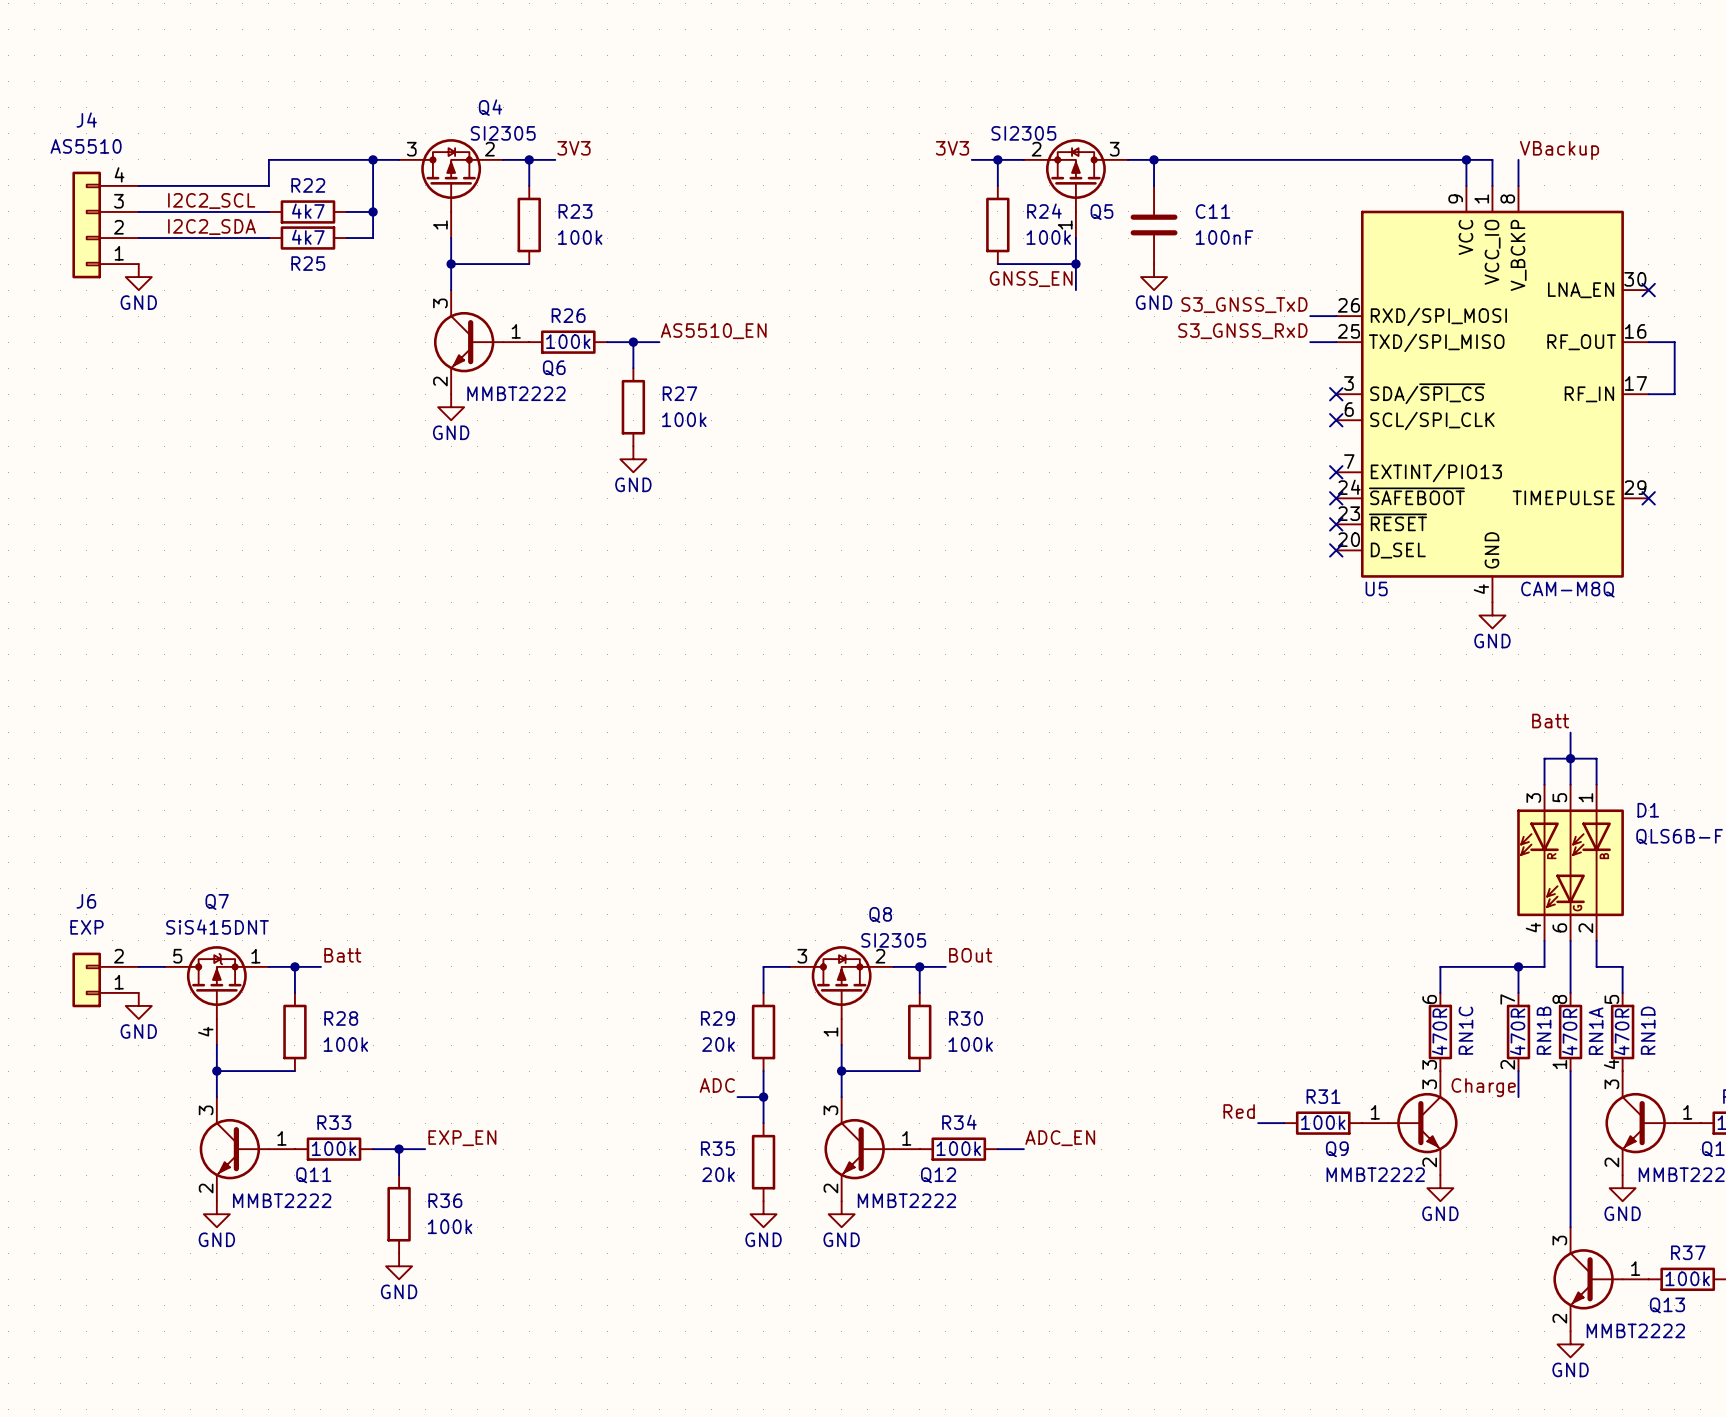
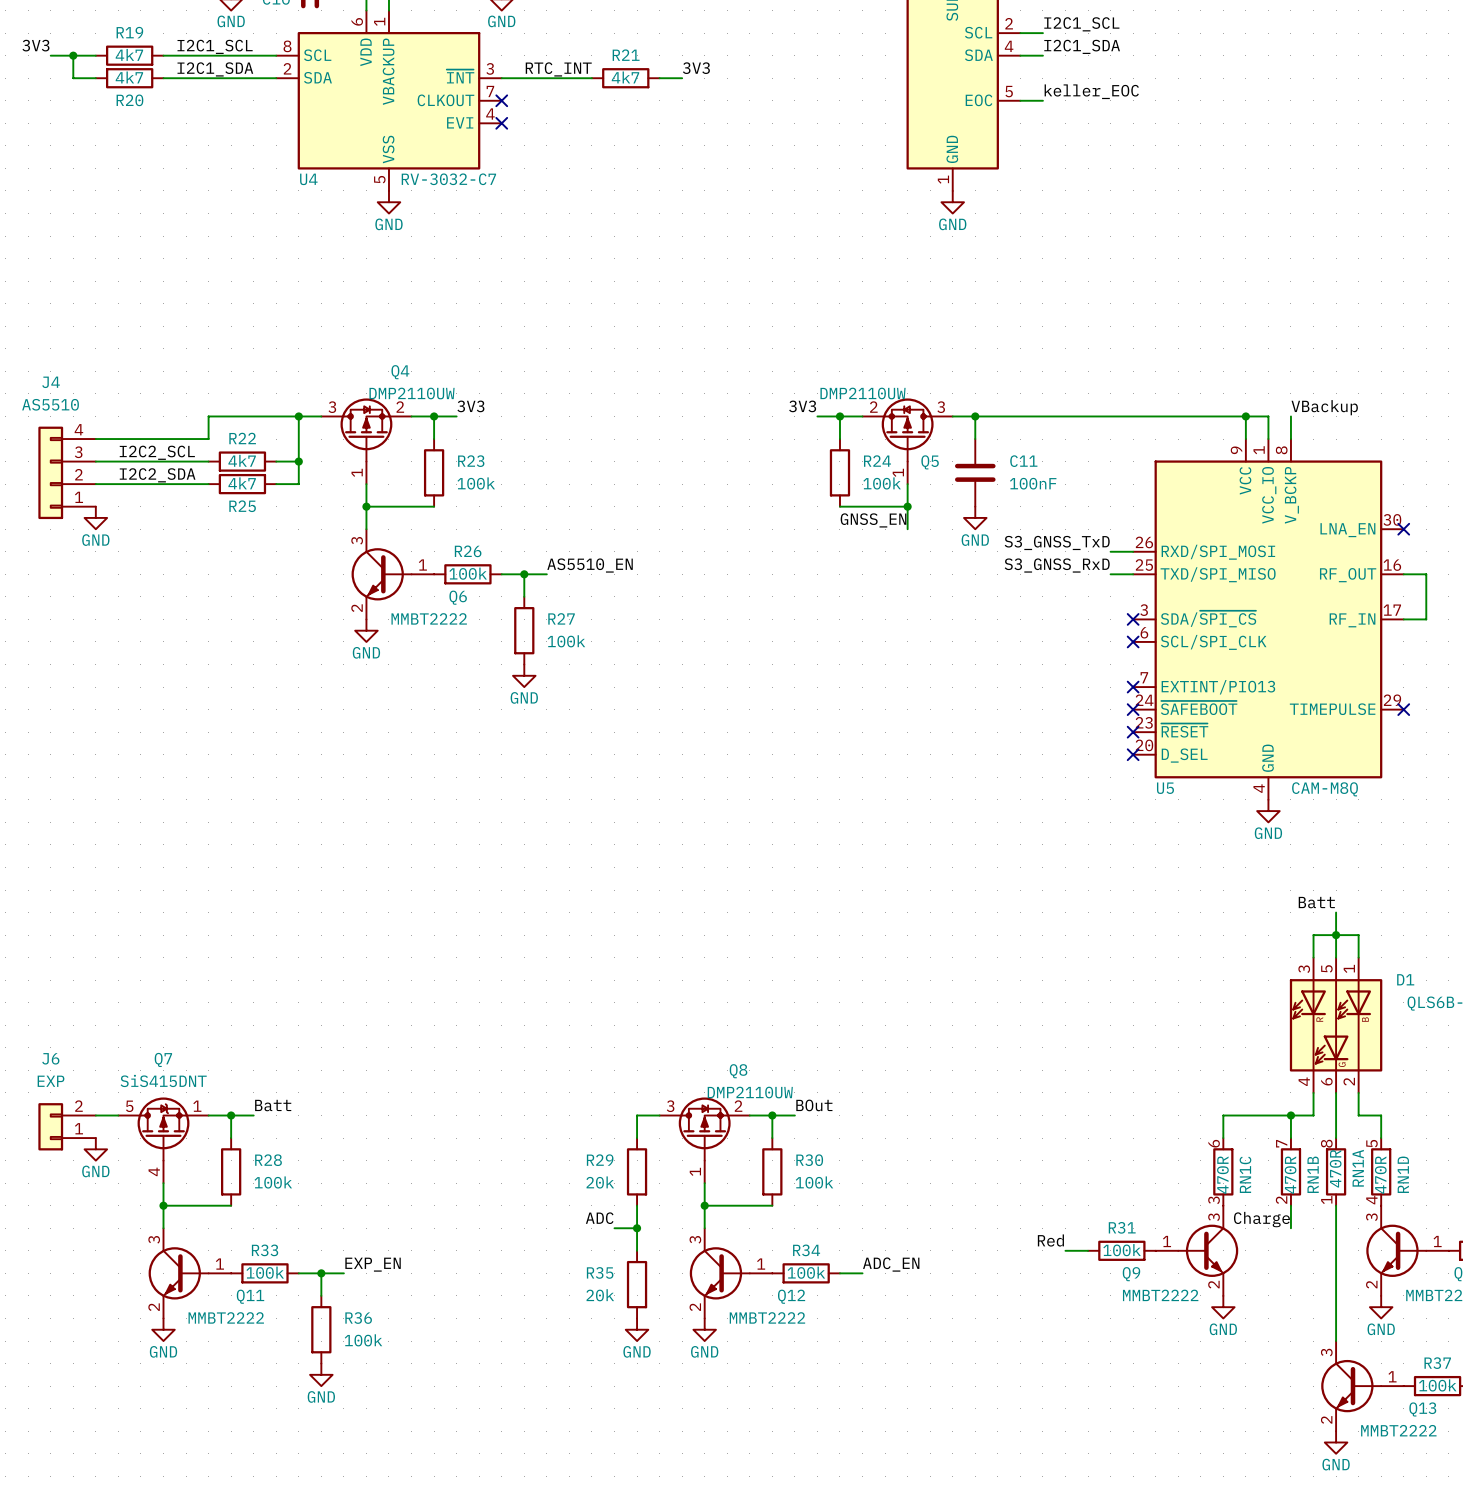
Q4 value: SI2305 (503, 133) -> DMP2110UW (412, 393)
Q5 value: SI2305 (1023, 133) -> DMP2110UW (863, 393)
Q8 value: SI2305 (893, 940) -> DMP2110UW (750, 1092)

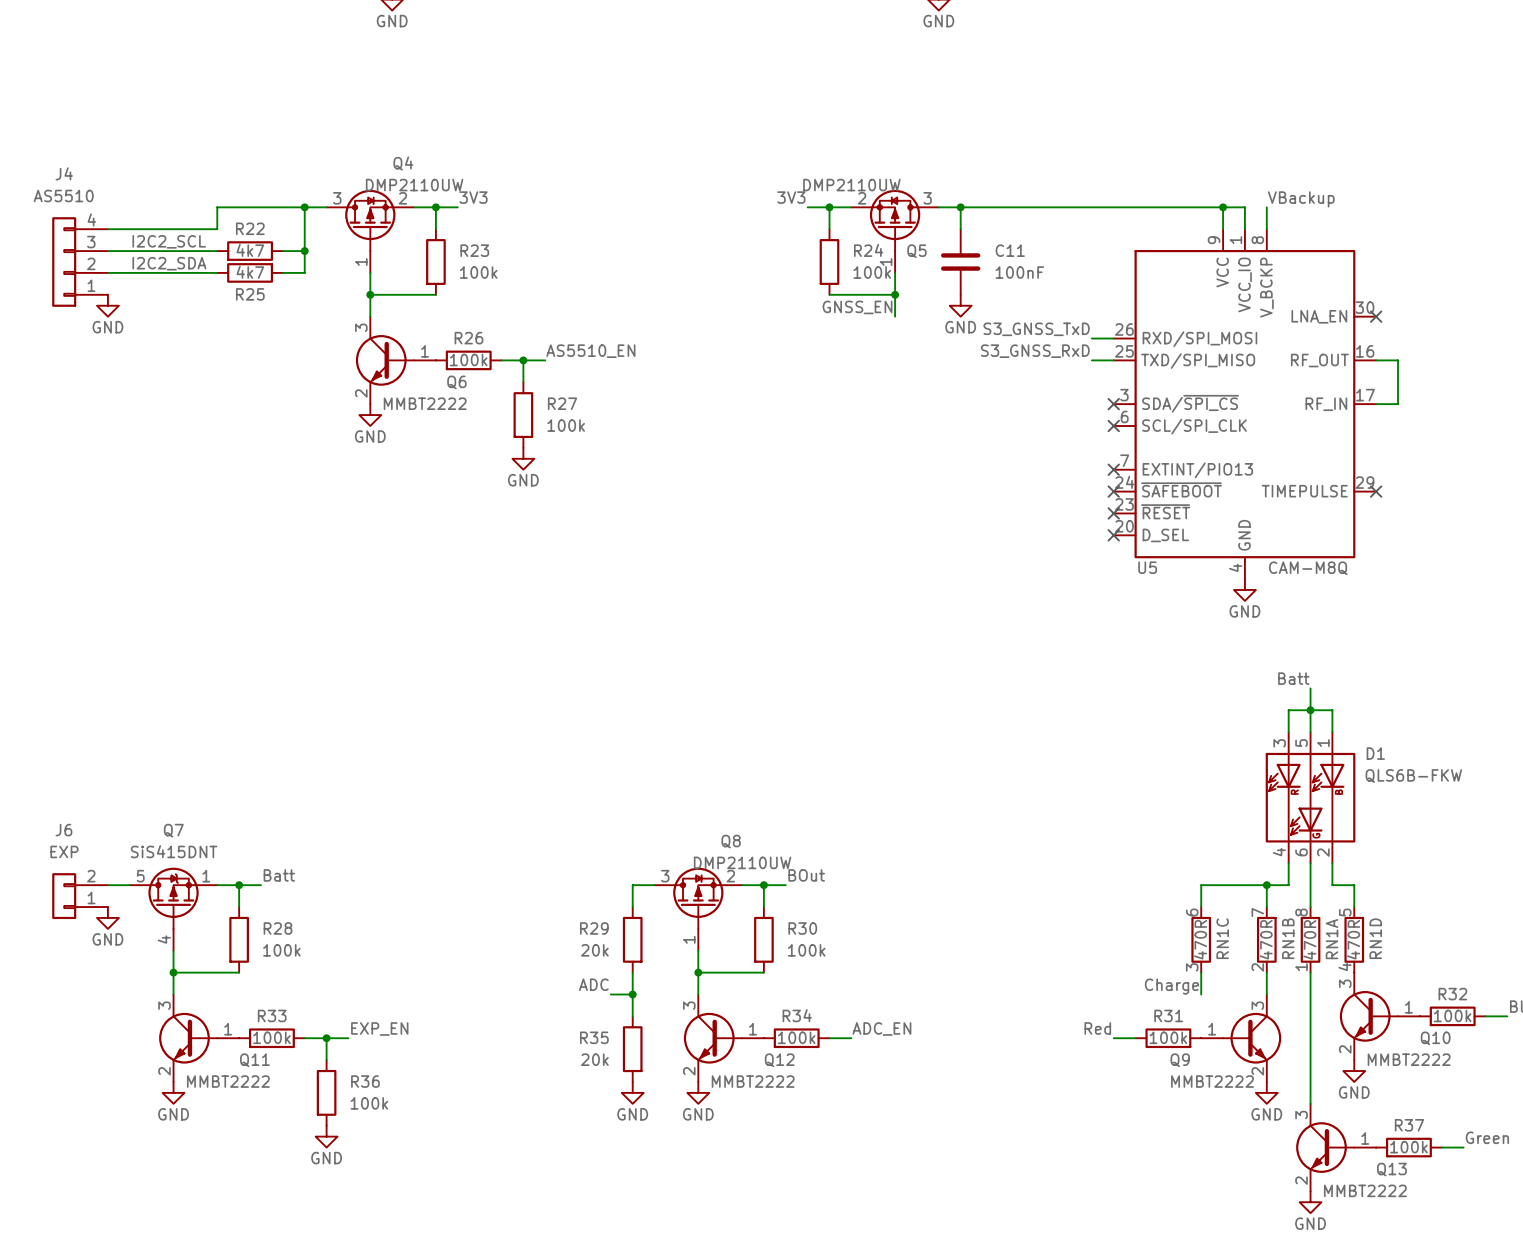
label position: Charge (1261, 1219) -> Charge (1171, 986)
label position: Red (1050, 1240) -> Red (1097, 1028)
wire: (1065, 1250) (1088, 1250) -> (1113, 1038) (1135, 1038)
R31 position: (1121, 1250) -> (1168, 1038)
Q9 position: (1196, 1250) -> (1241, 1038)
power symbol position: GND (1223, 1307) -> GND (1266, 1092)

